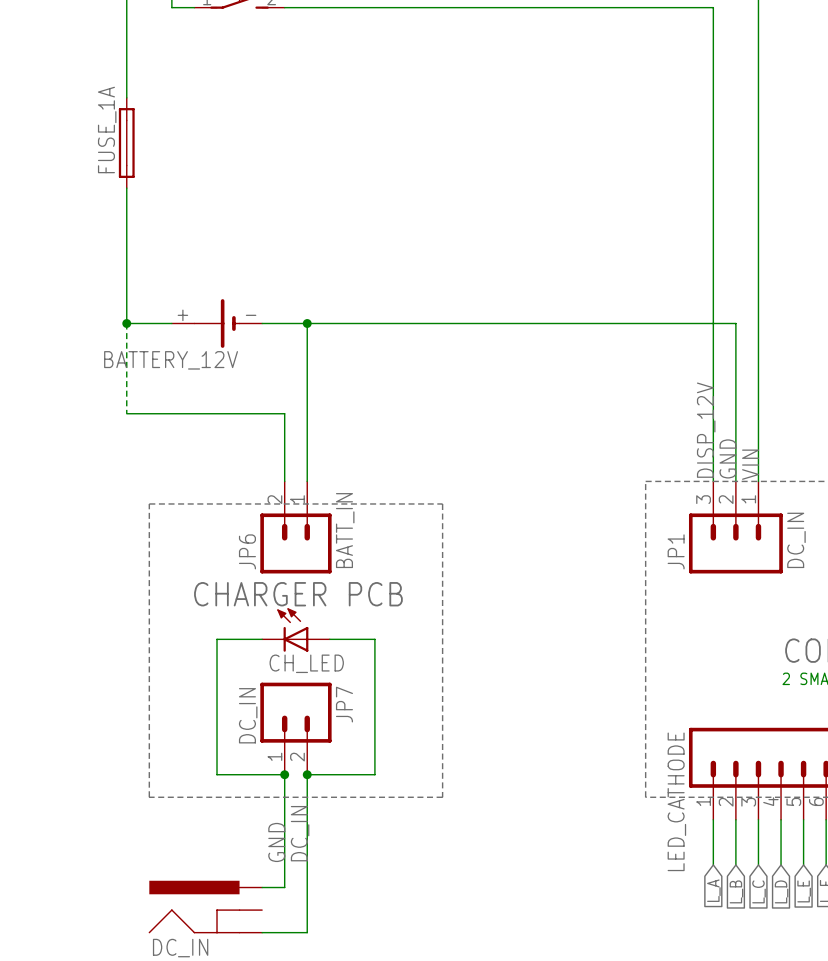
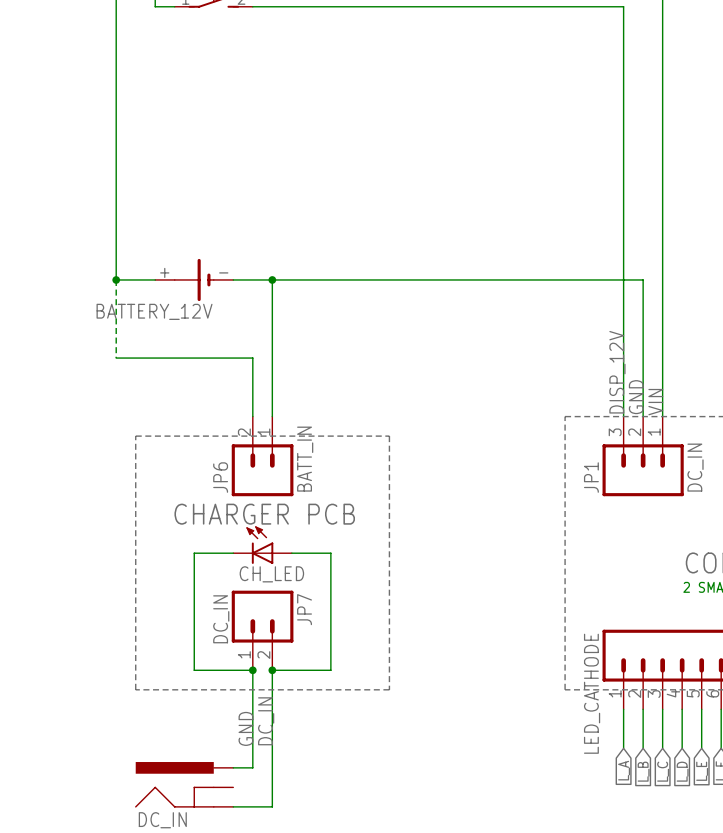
FUSE_1A: (126, 143) -> none

